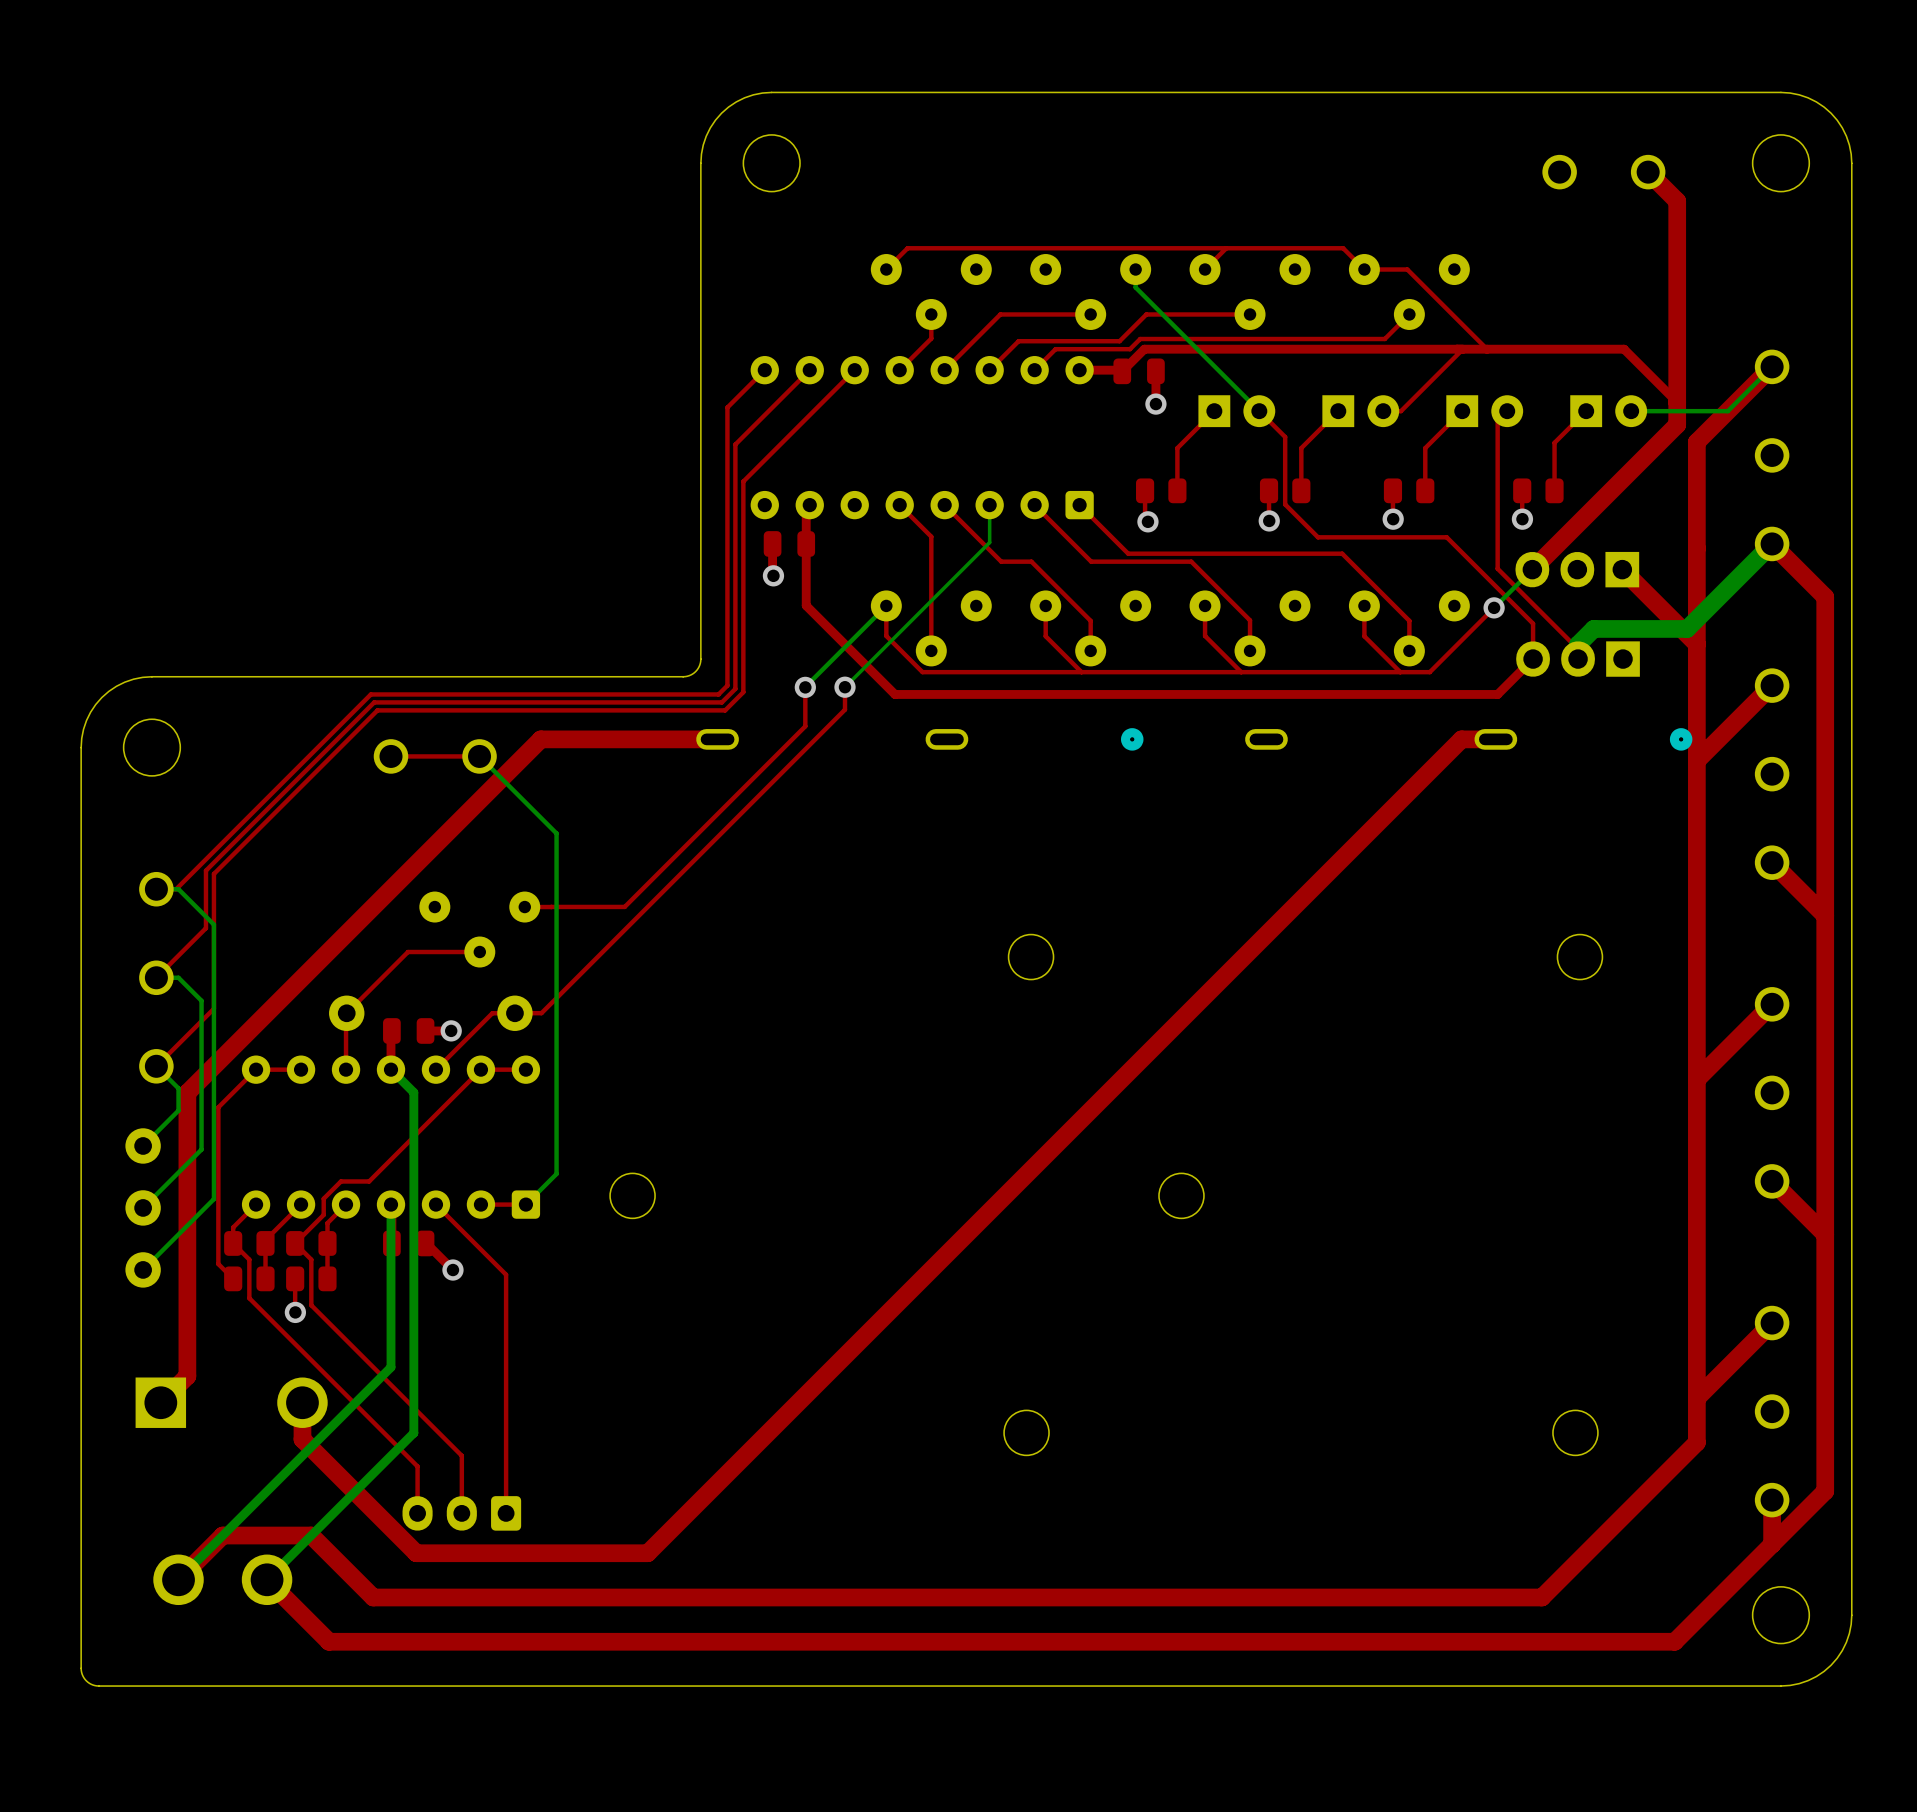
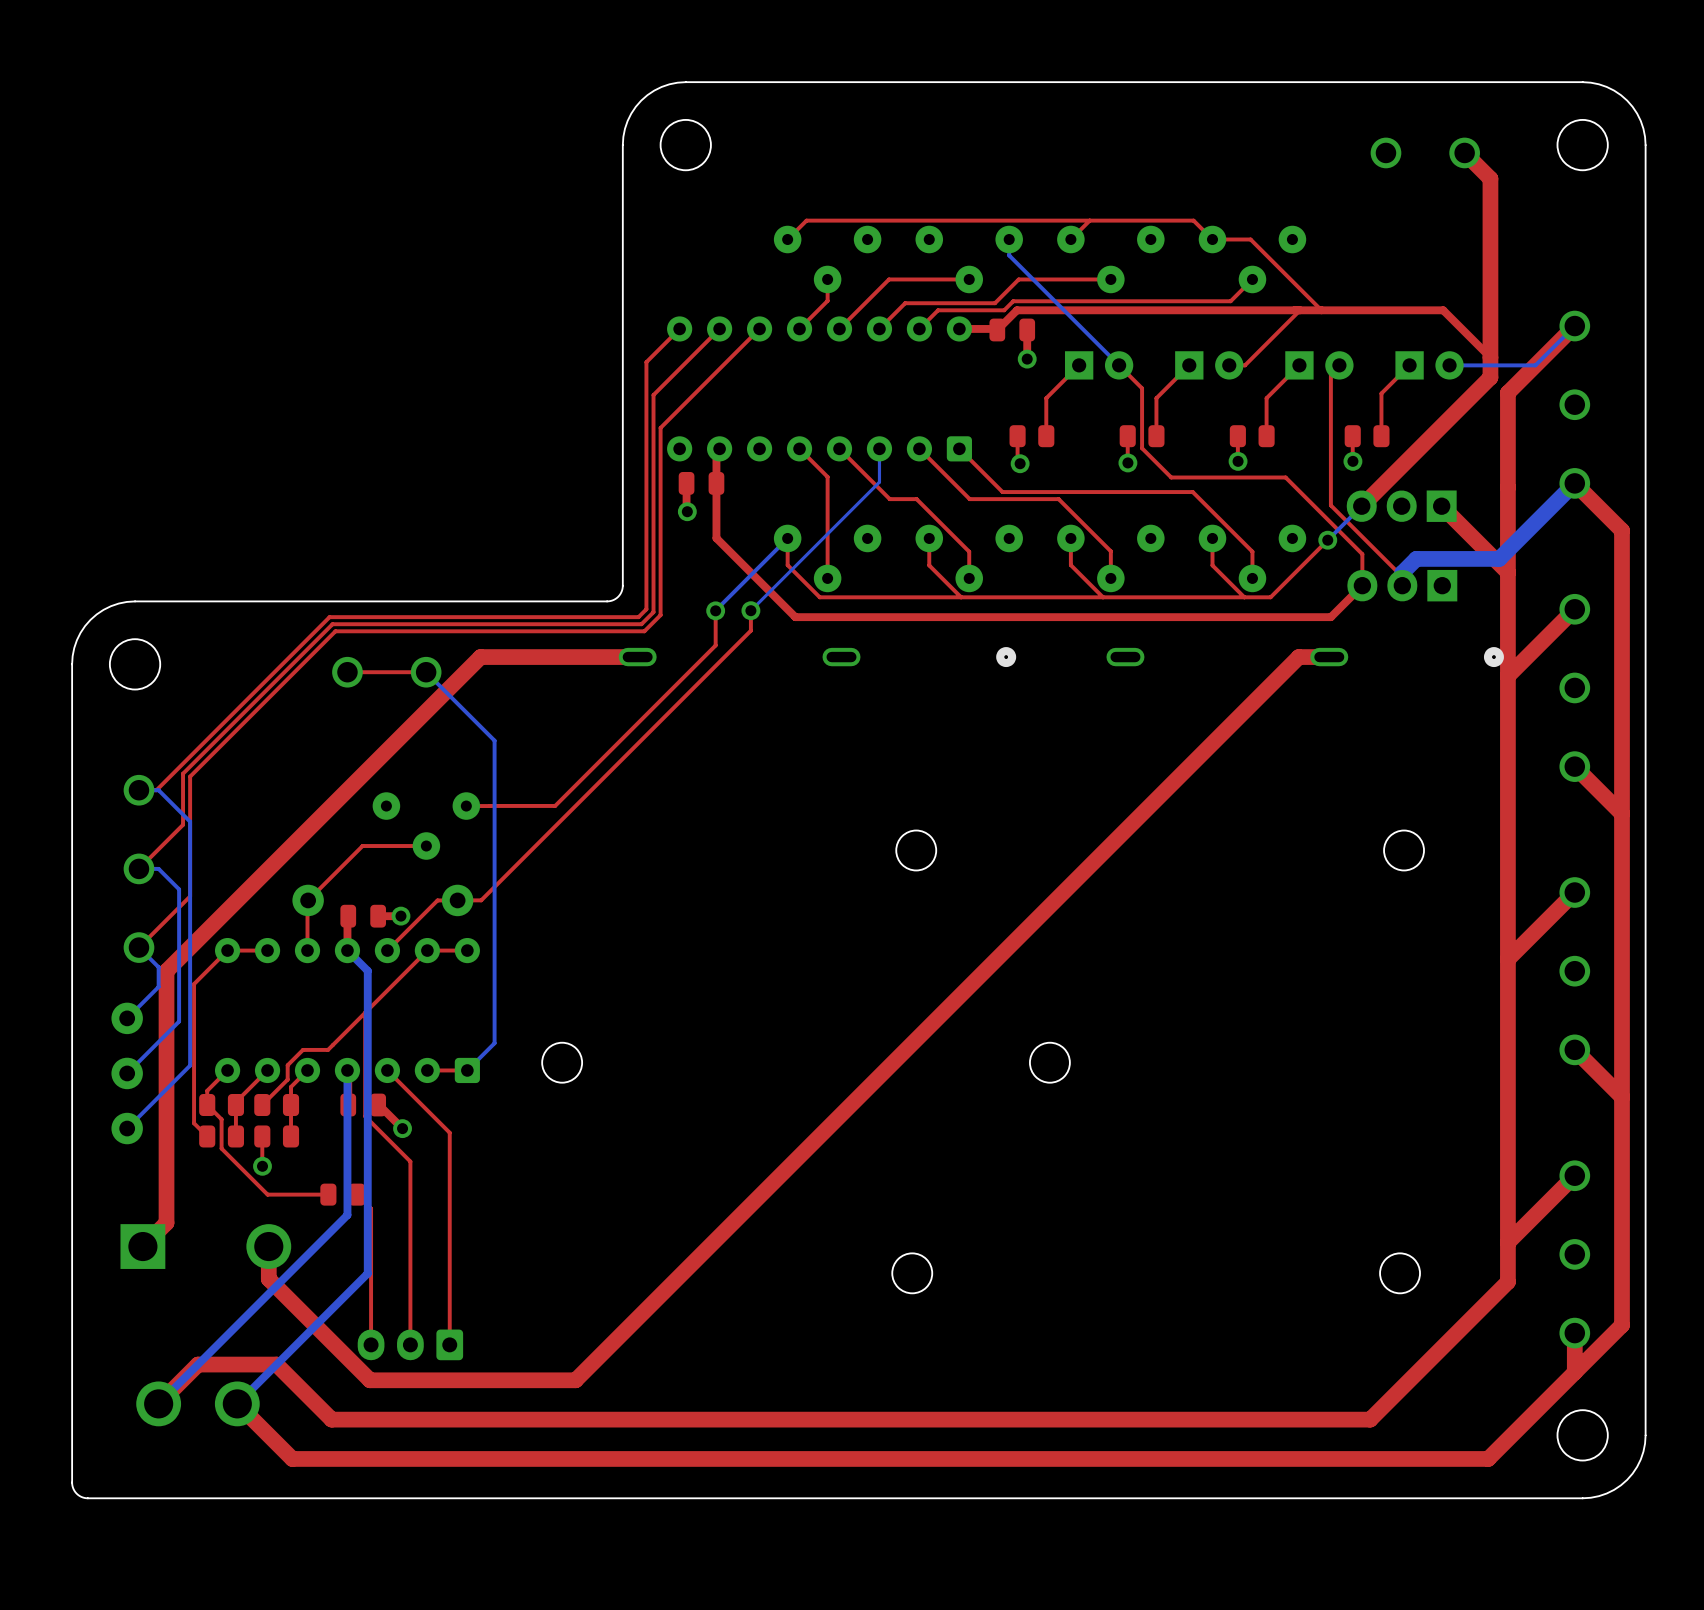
top track: (295, 1243) (311, 1259) (311, 1305) (461, 1455) -> (365, 1012) (365, 1116) (410, 1161) (410, 1293)
top track: (249, 1292) (249, 1298) (417, 1466) -> (221, 1148) (267, 1194) (328, 1194)
part: none -> (342, 1194)
top track: none -> (357, 1194) (371, 1208) (371, 1303)

